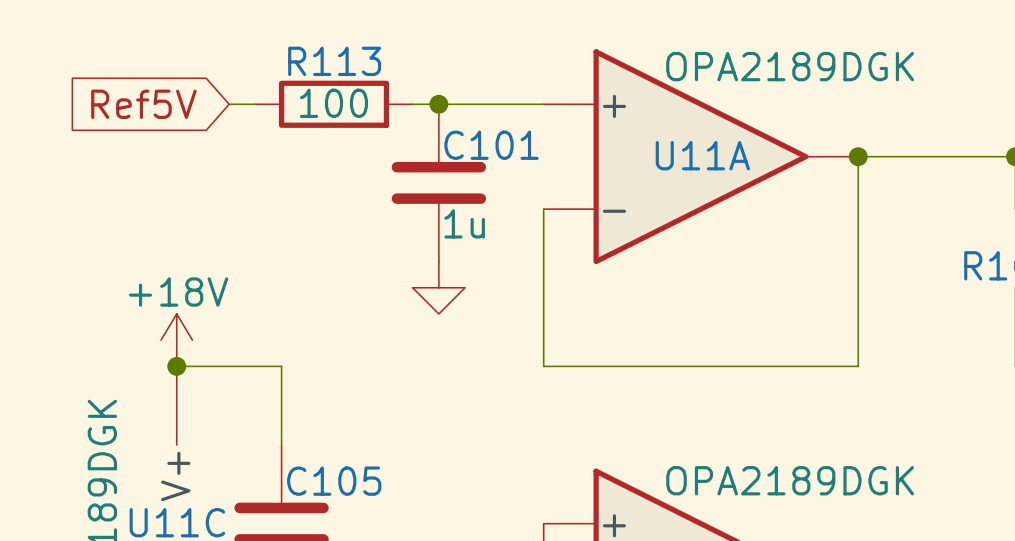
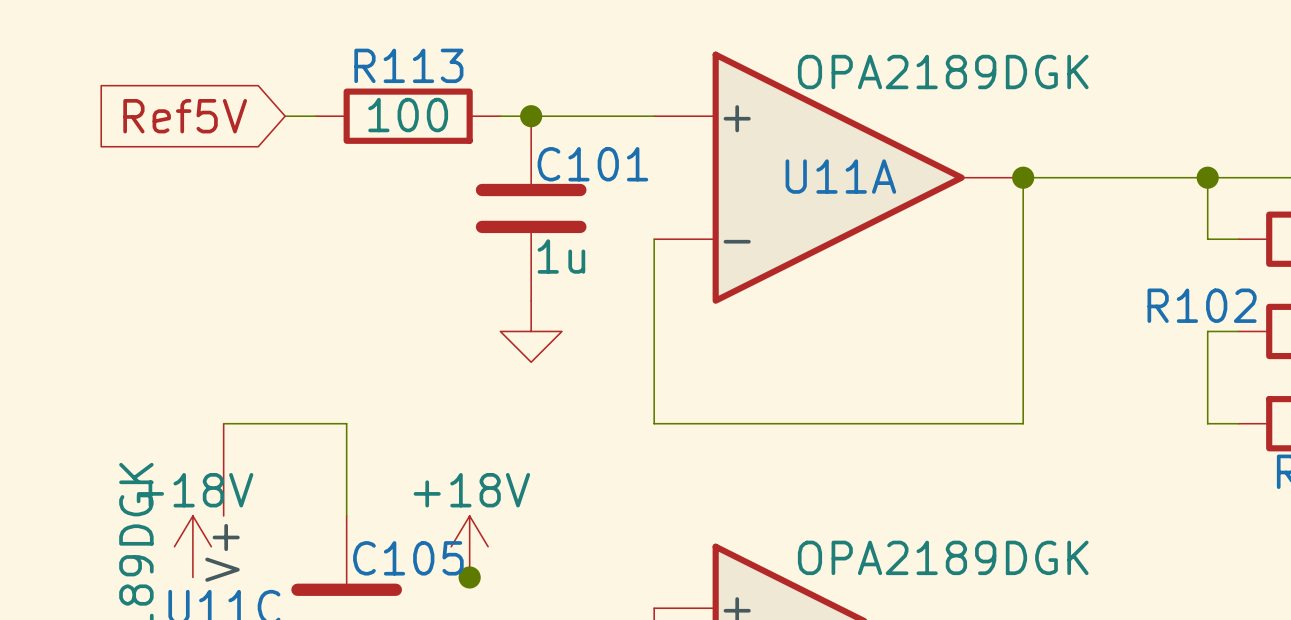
power symbol: +18V (176, 340) -> none
junction: (176, 366) -> none
power symbol: none -> +18V (192, 546)
power symbol: none -> +18V (469, 546)
junction: none -> (469, 577)

